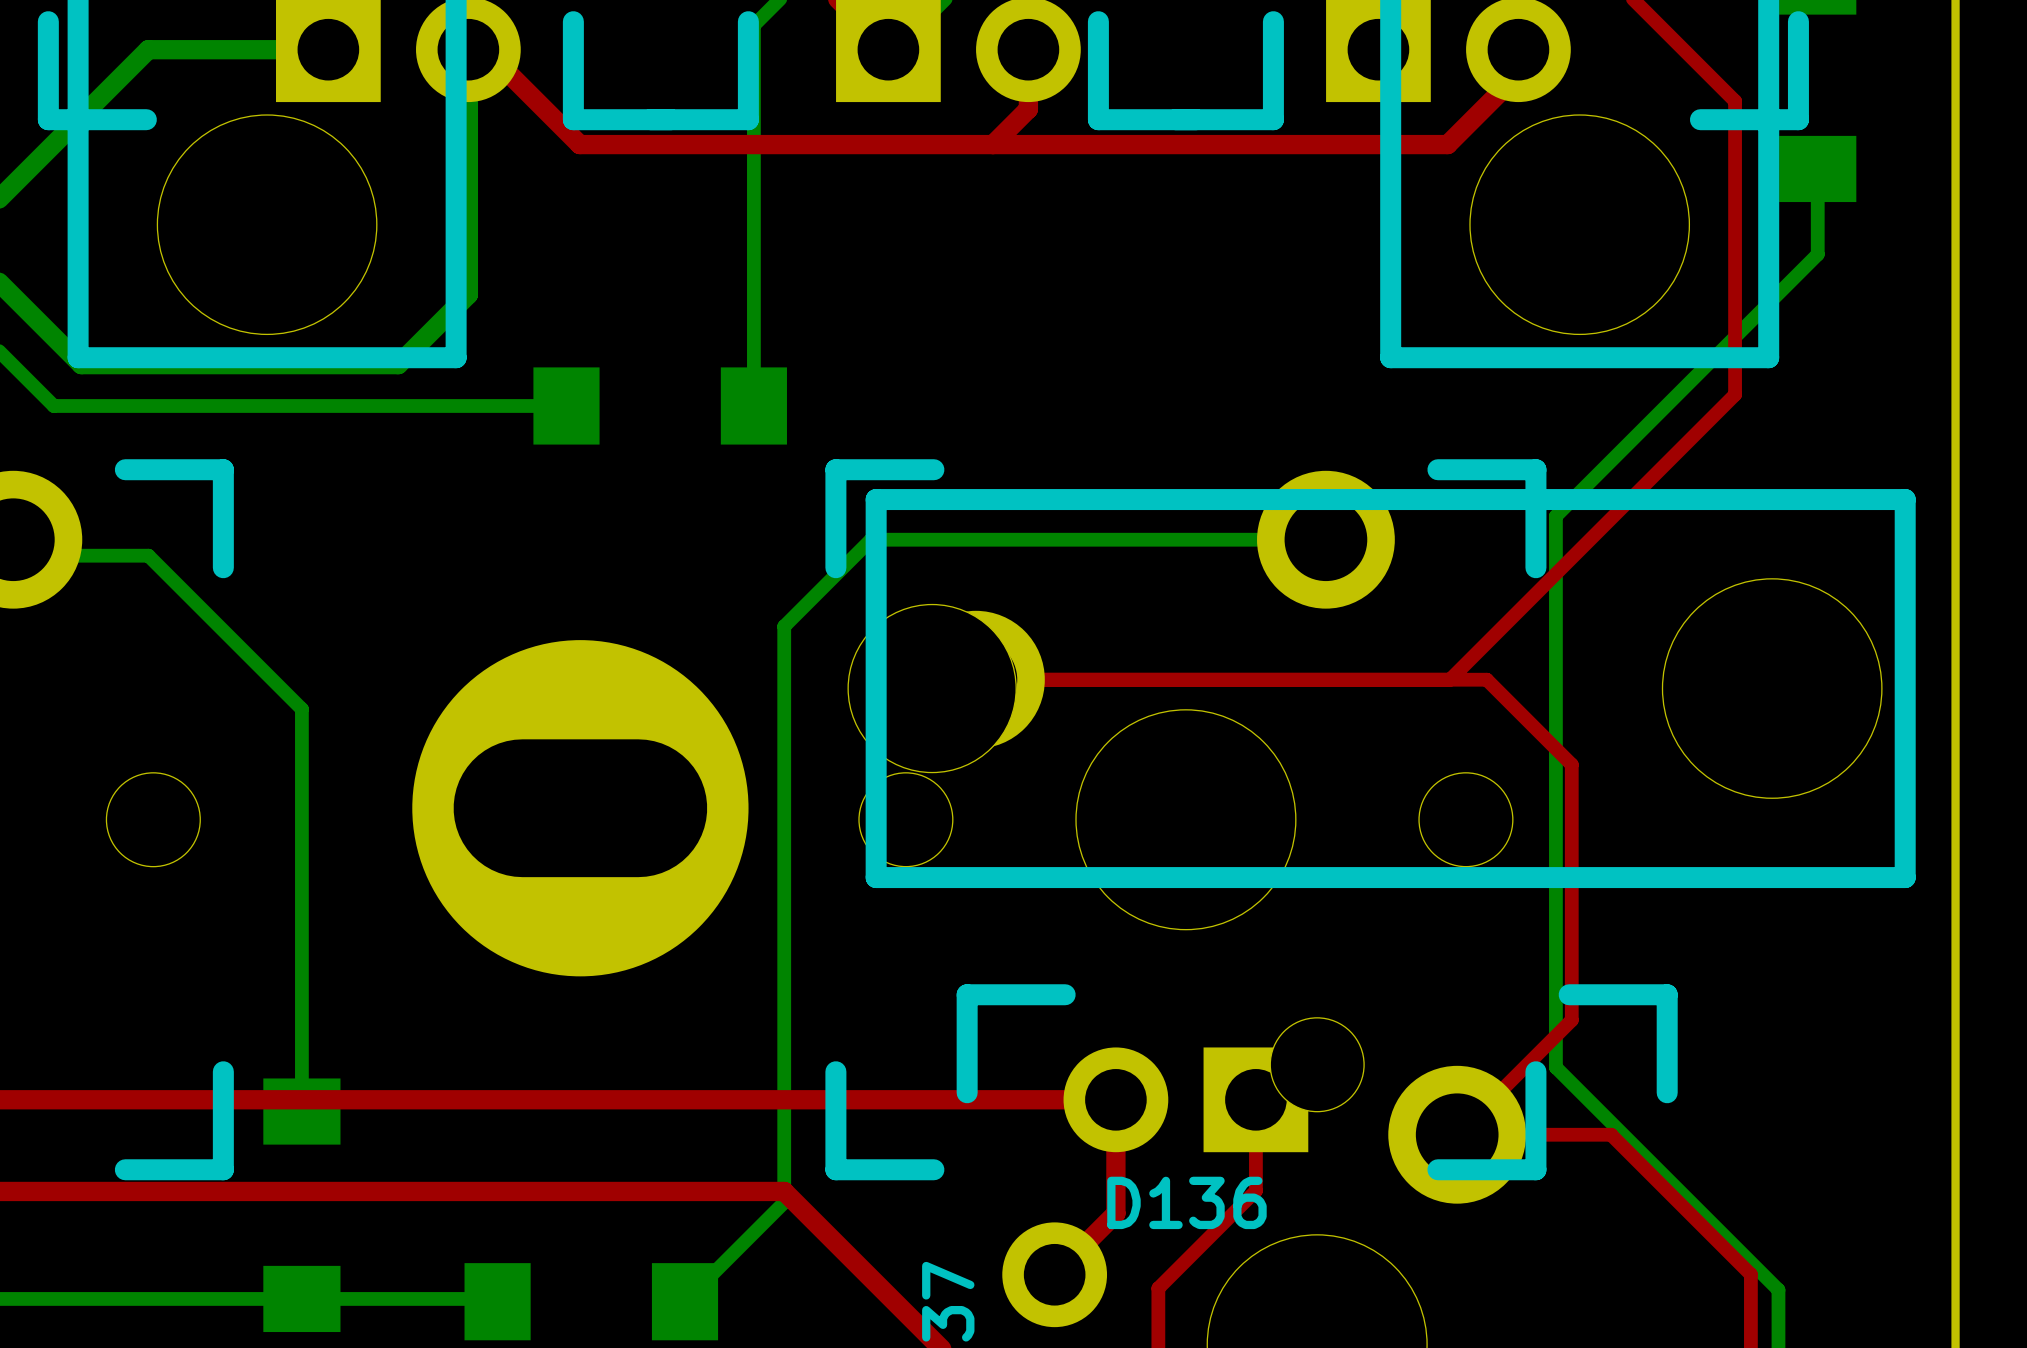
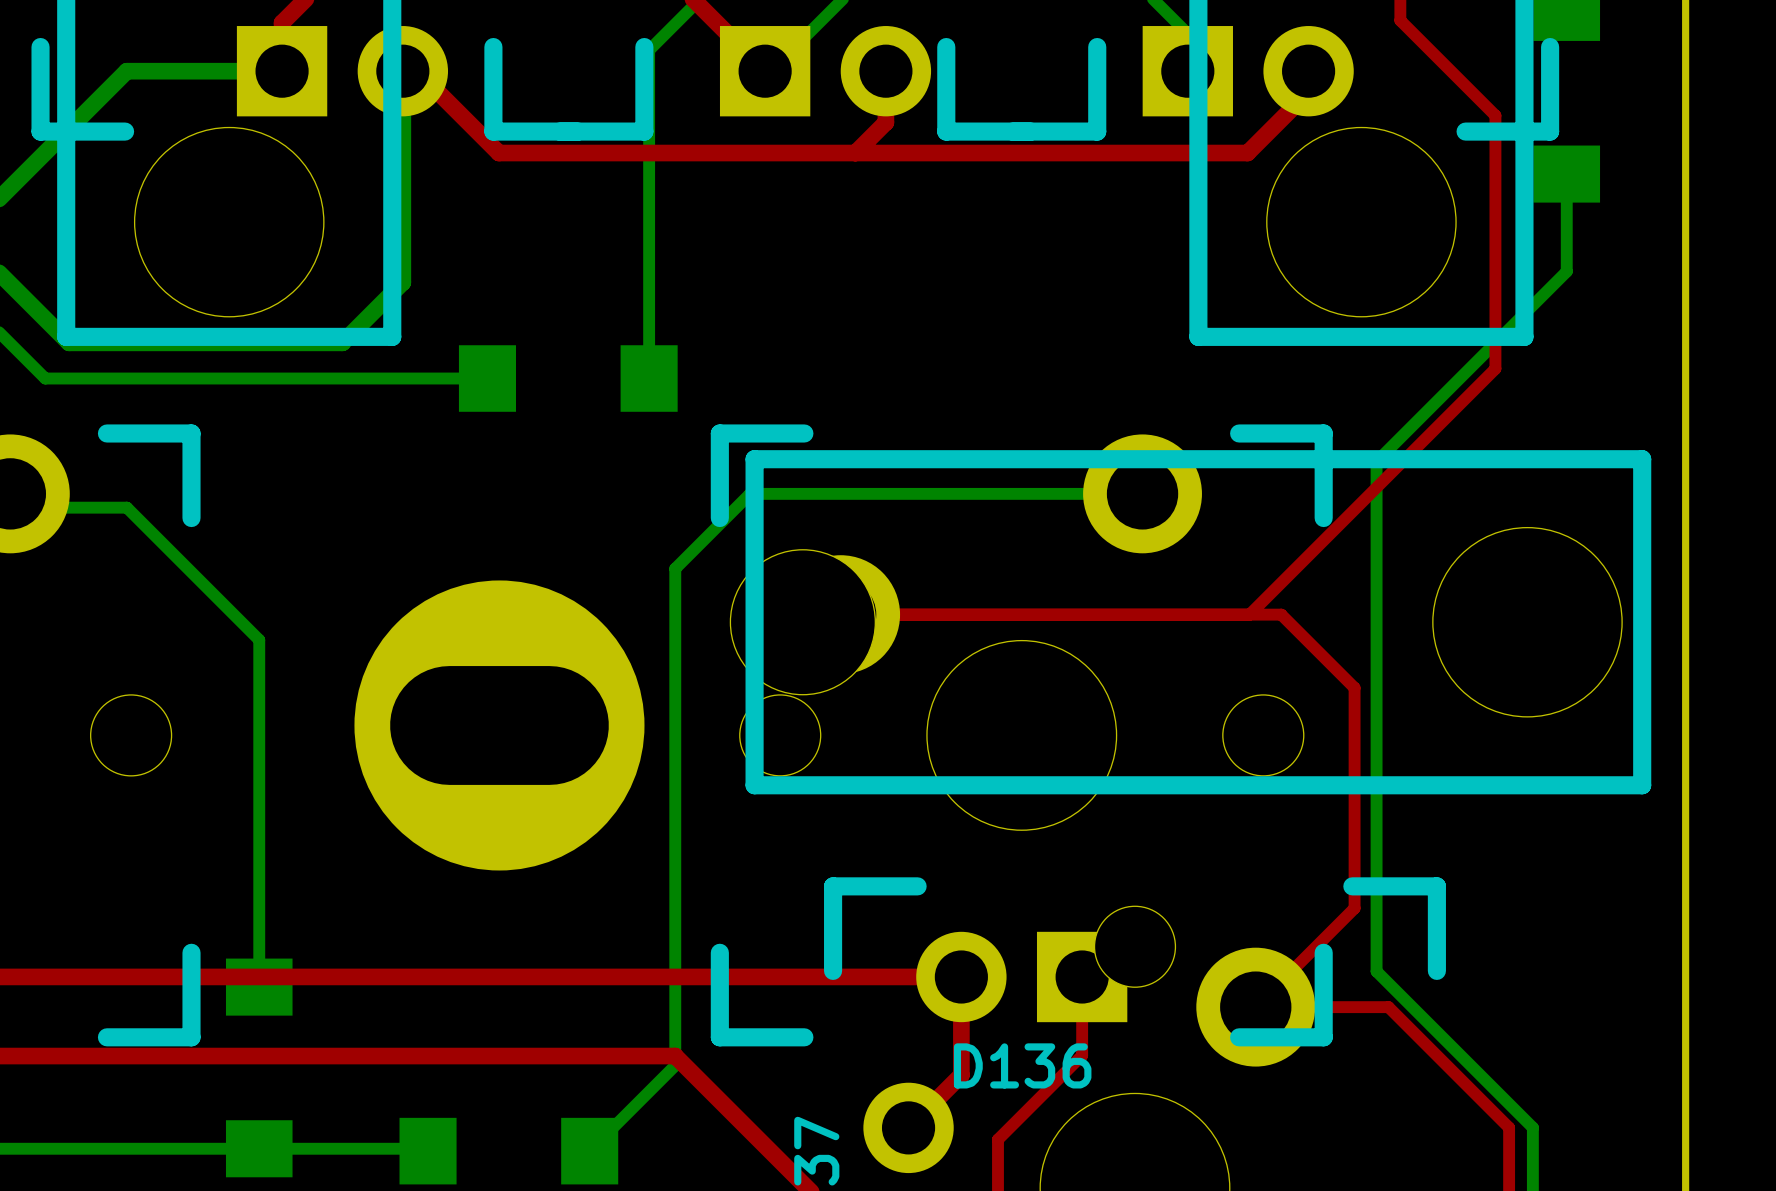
bottom track: (1817, 254) (1555, 516) (1555, 1067) (1778, 1289) -> (1566, 247) (1566, 271) (1376, 461) (1376, 971) (1532, 1127) (1532, 1141)

